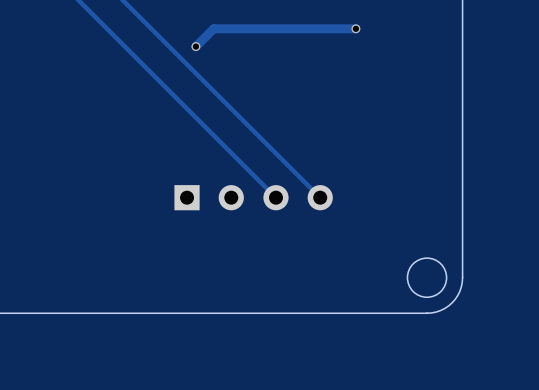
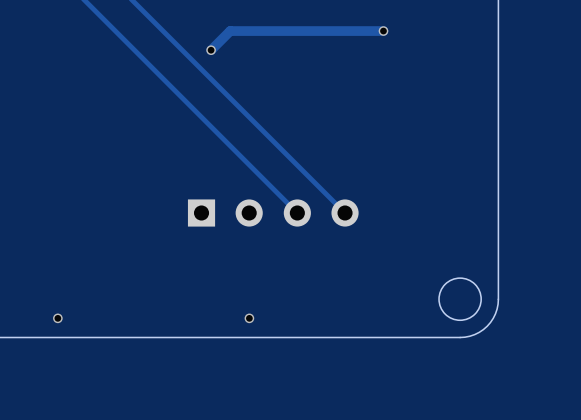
via: none -> (57, 318)
via: none -> (249, 318)

